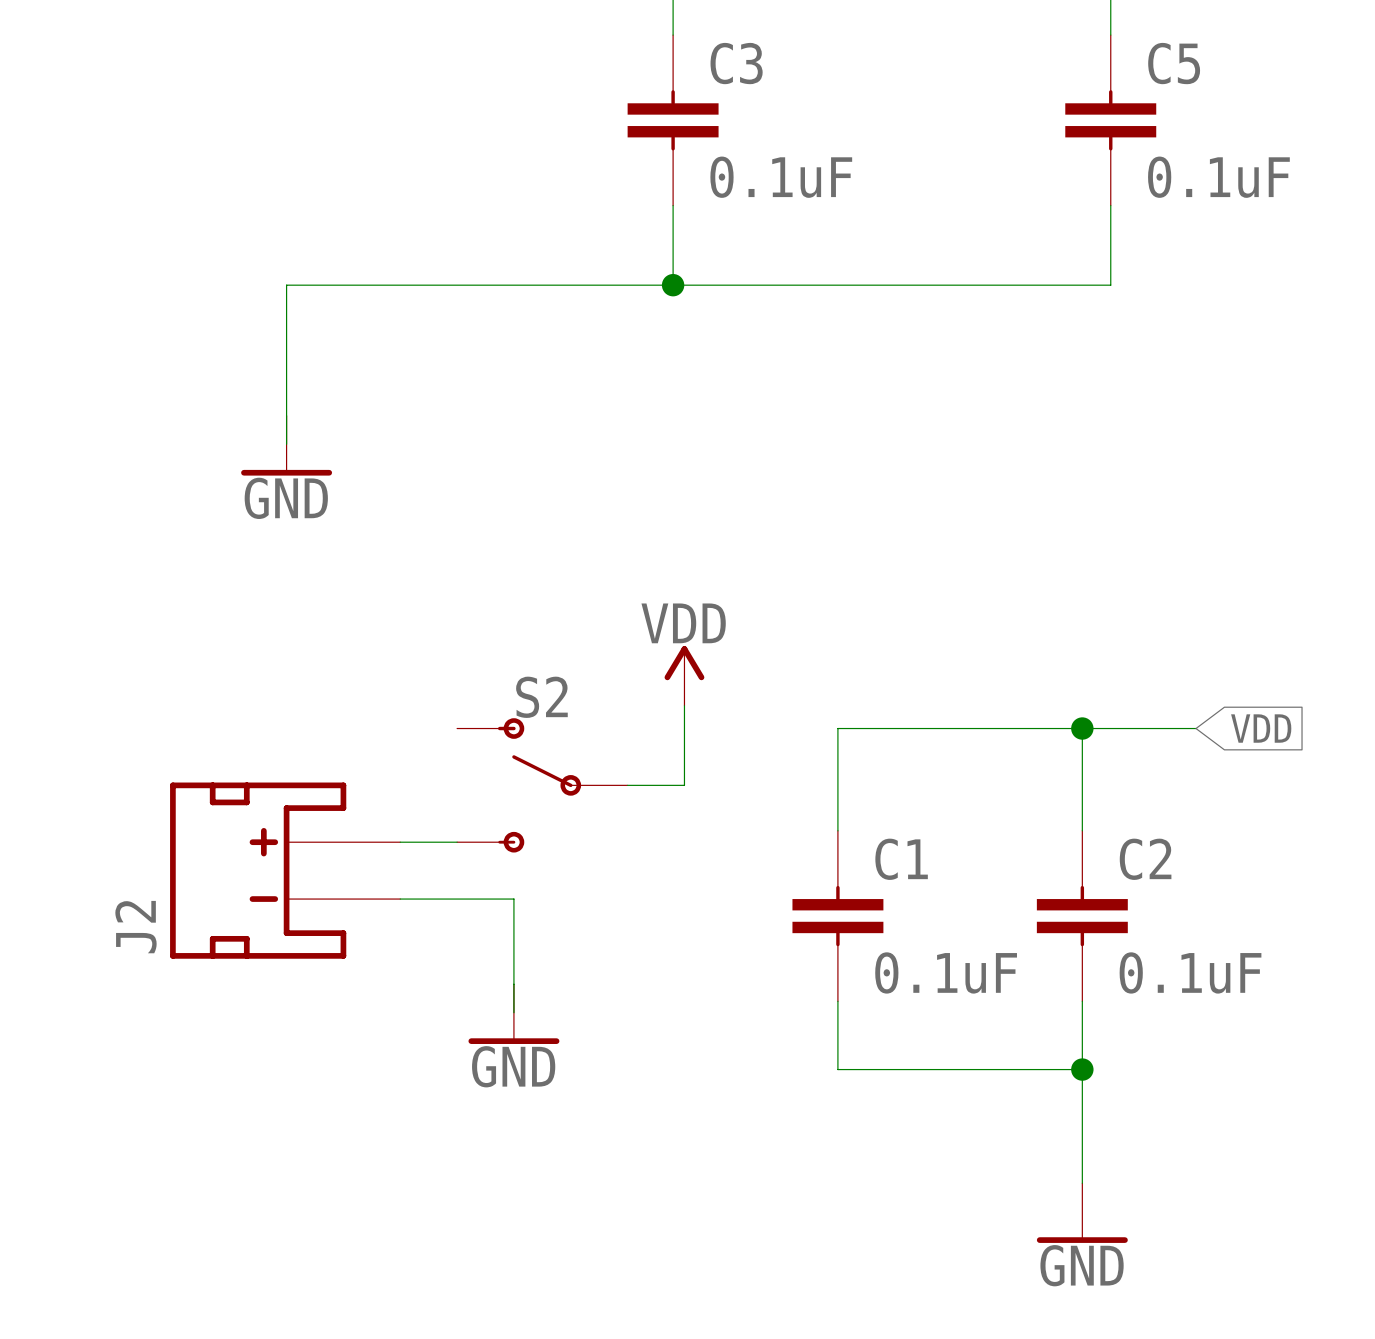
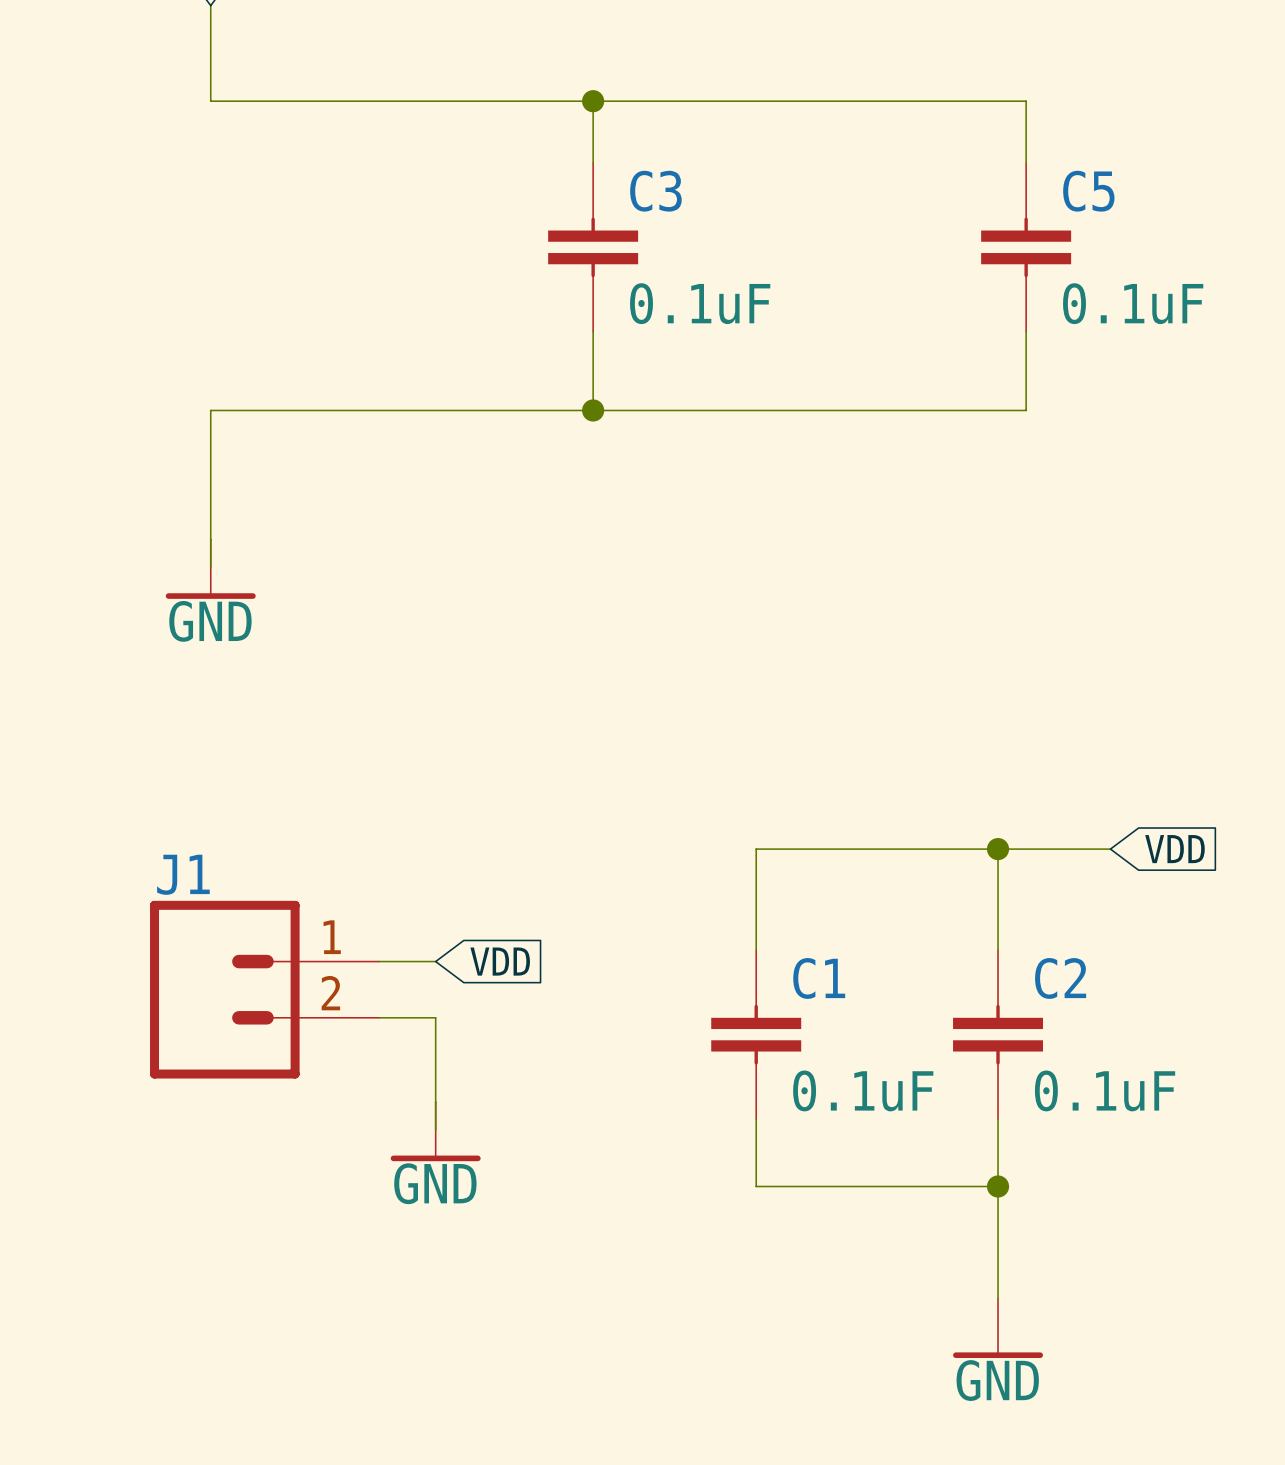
power symbol: VDD (684, 675) -> none
wire: (684, 705) (684, 785) (627, 785) -> none
S2: (542, 785) -> none
global label: none -> VDD (500, 961)
J2: (285, 870) -> none
J1: none -> (264, 989)

